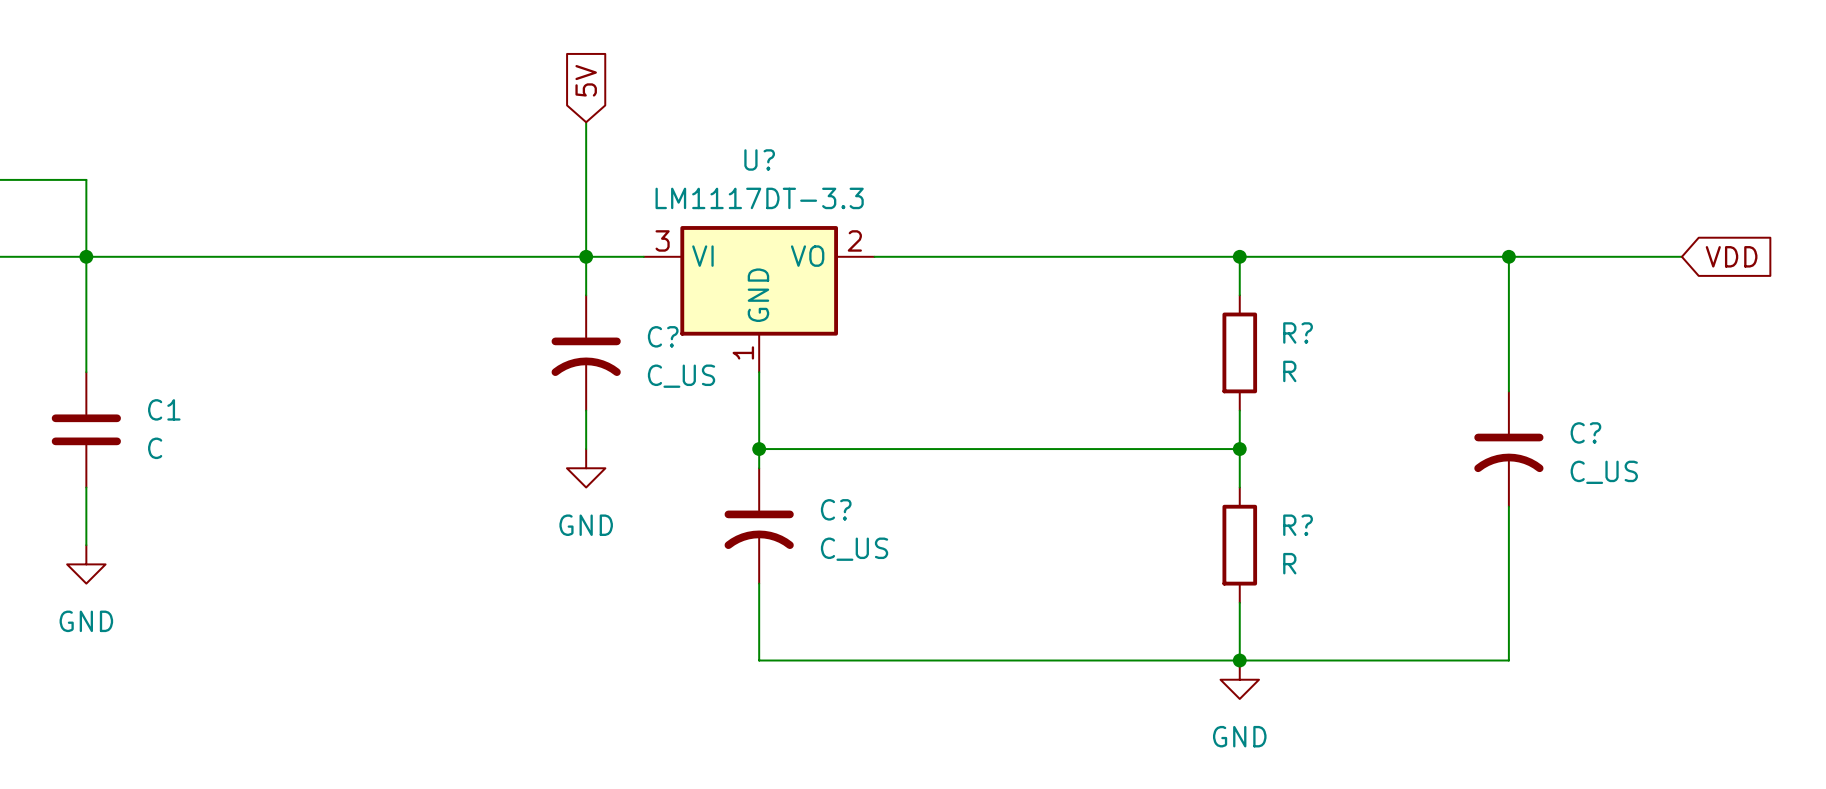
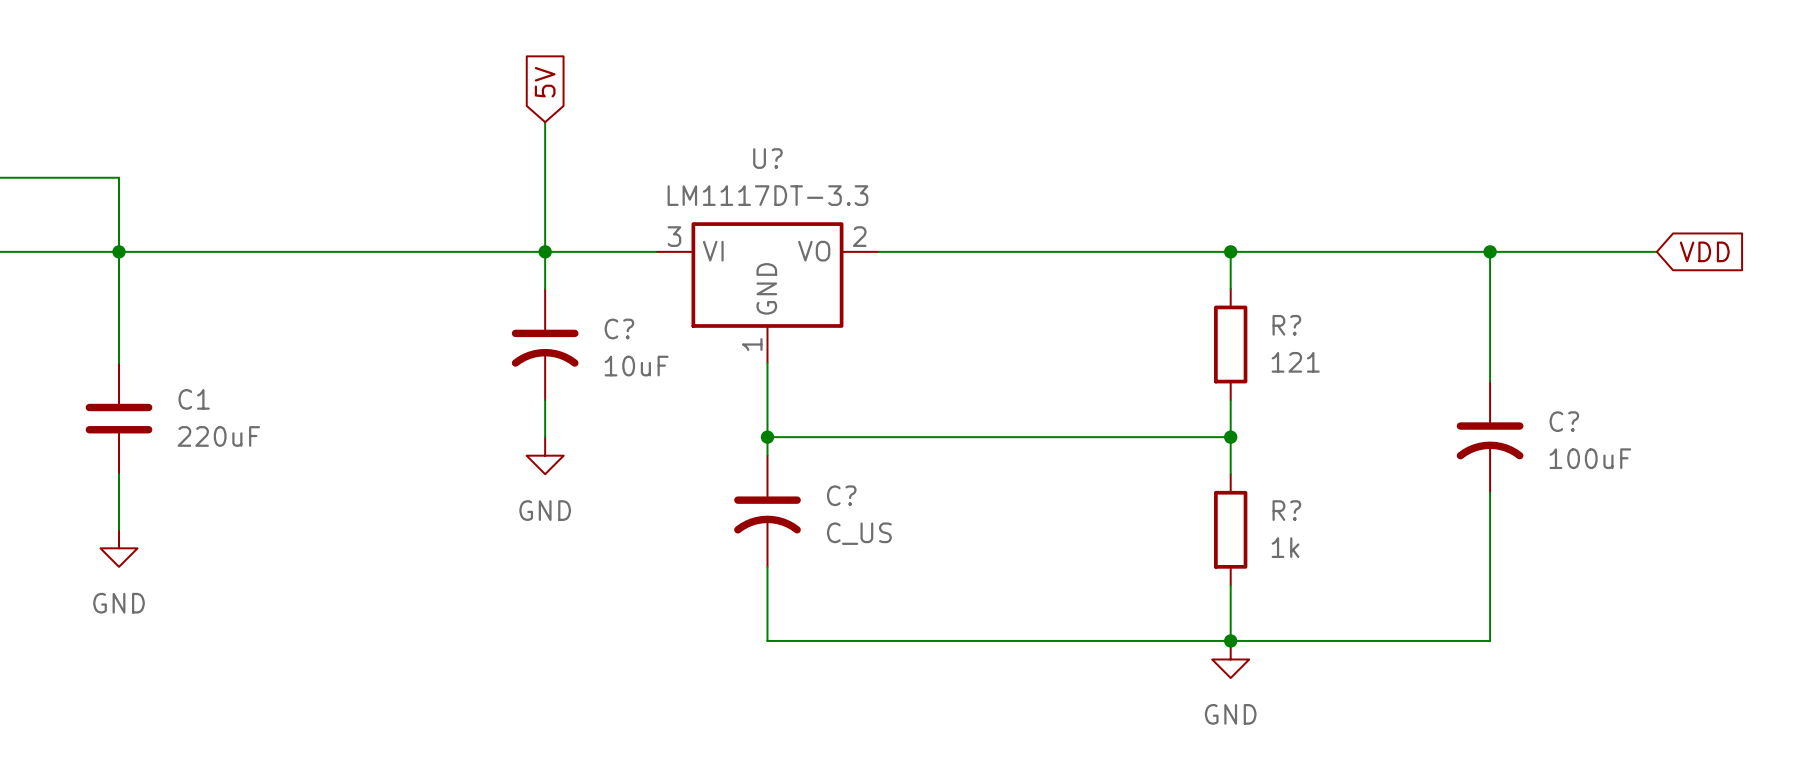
global label position: 5V (586, 80) -> 5V (545, 82)
wire: (586, 122) (586, 295) -> (545, 122) (545, 288)
junction position: (586, 256) -> (545, 251)
C?: none -> 10uF (545, 344)
C?: C_US (586, 352) -> none
R? value: R (1289, 371) -> 121 (1295, 362)
wire: (586, 410) (586, 449) -> (545, 400) (545, 437)
C1 value: C (155, 448) -> 220uF (218, 436)
power symbol position: GND (586, 468) -> GND (545, 455)
C? value: C_US (1604, 472) -> 100uF (1590, 458)
R? value: R (1289, 563) -> 1k (1285, 547)

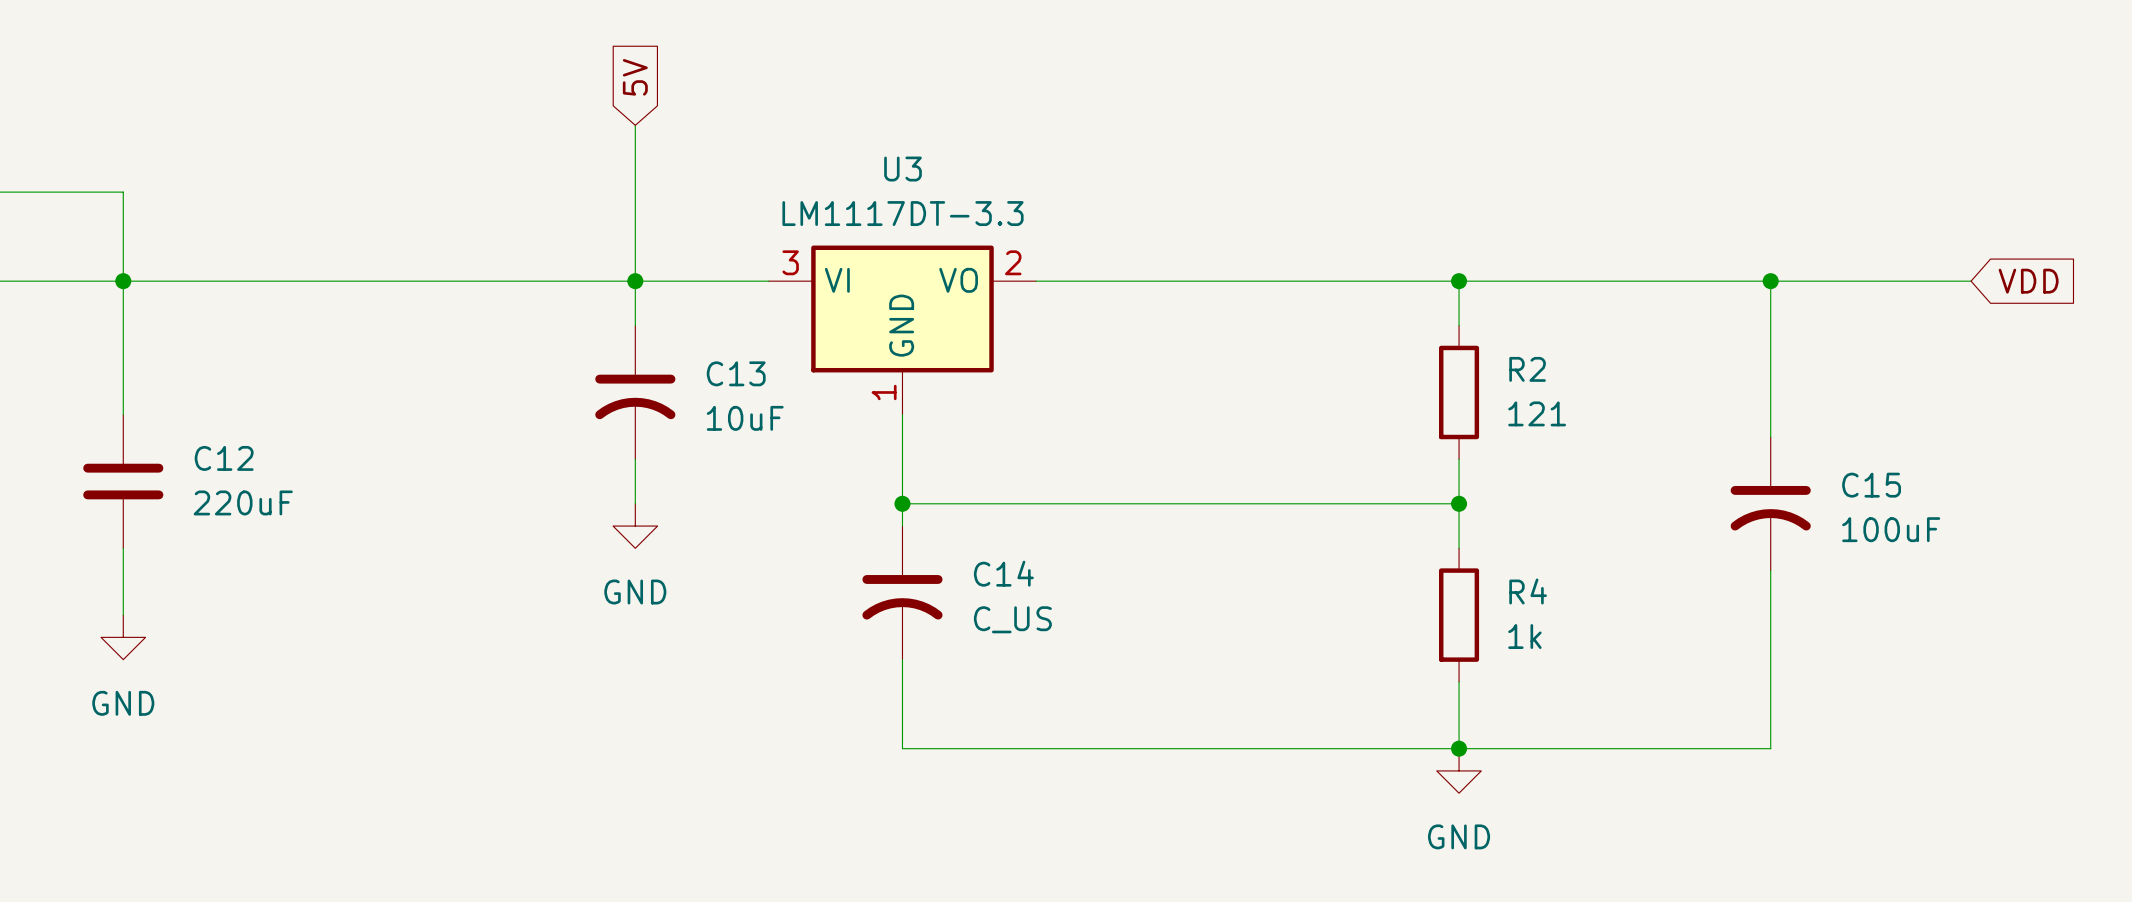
U? name: U? (767, 158) -> U3 (903, 169)
R? name: R? (1286, 325) -> R2 (1527, 369)
C? name: C? (619, 328) -> C13 (736, 373)
C1 name: C1 (194, 399) -> C12 (224, 458)
C? name: C? (1564, 421) -> C15 (1871, 485)
C? name: C? (841, 495) -> C14 (1003, 573)
R? name: R? (1286, 510) -> R4 (1528, 591)

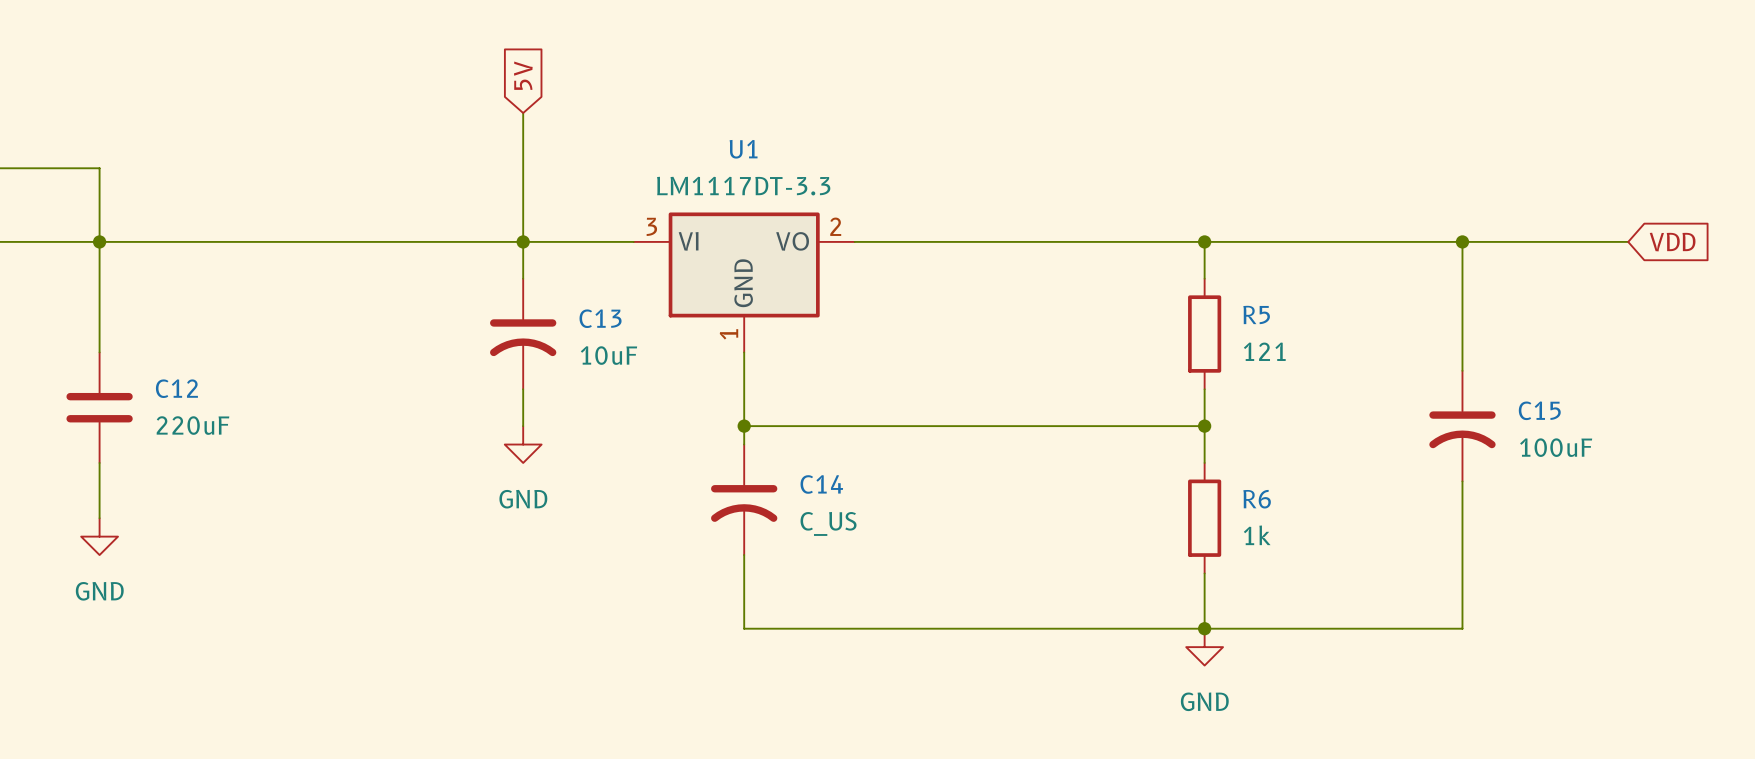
U3 name: U3 (903, 169) -> U1 (743, 149)
R2 name: R2 (1527, 369) -> R5 (1256, 314)
R4 name: R4 (1528, 591) -> R6 (1257, 499)

